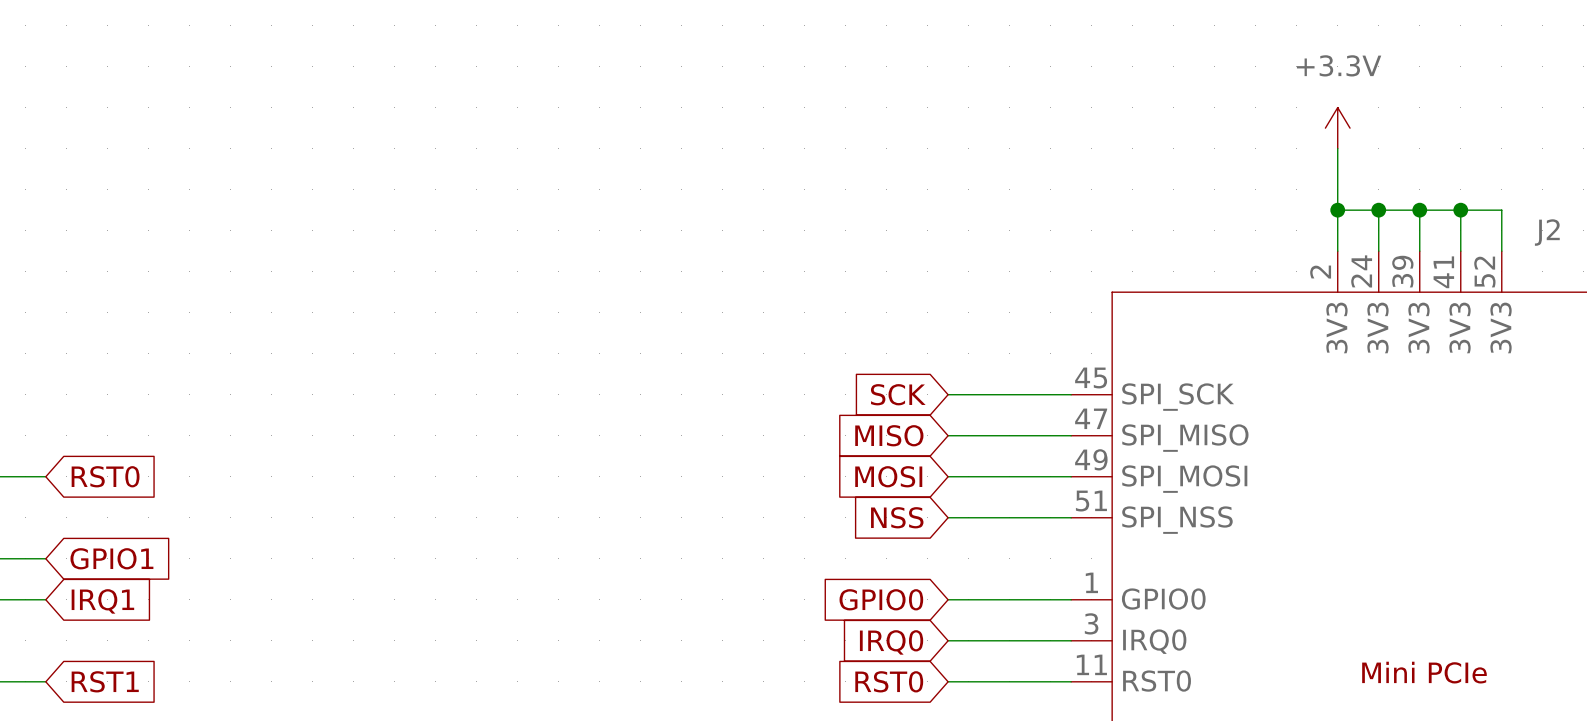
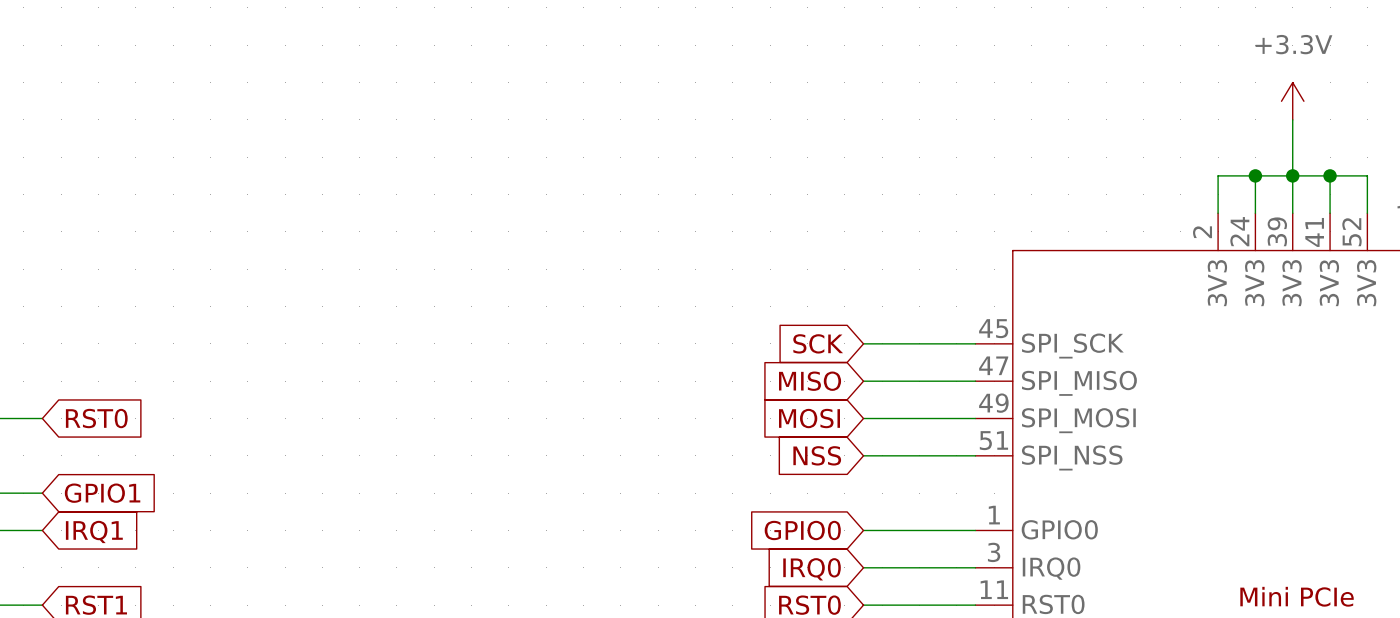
power symbol position: +3.3V (1337, 128) -> +3.3V (1292, 101)
wire: (1337, 148) (1337, 210) -> (1292, 119) (1292, 175)
junction: (1337, 210) -> none

